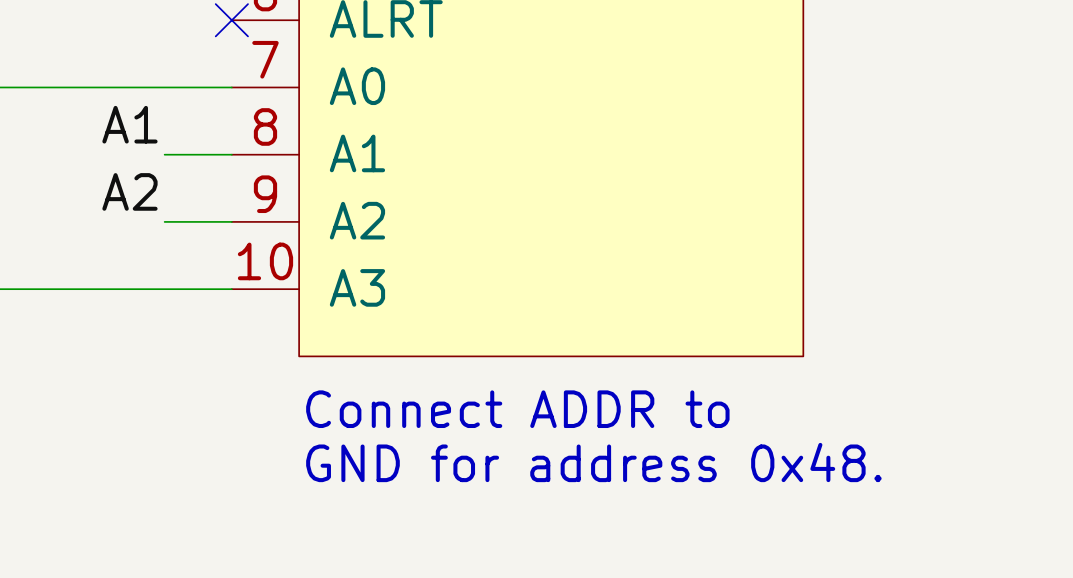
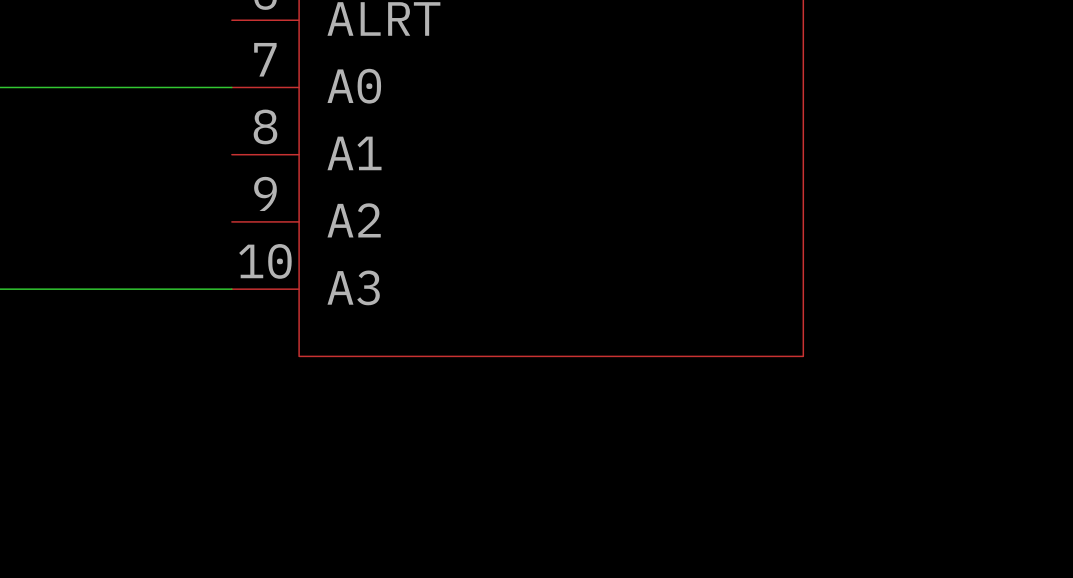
no-connect mark: (231, 20) -> none
label: A1 (129, 124) -> none
wire: (164, 154) (231, 154) -> none
label: A2 (129, 191) -> none
wire: (164, 221) (231, 221) -> none
text: Connect ADDR to (517, 409) -> none
text: GND for address 0x48. (593, 462) -> none

